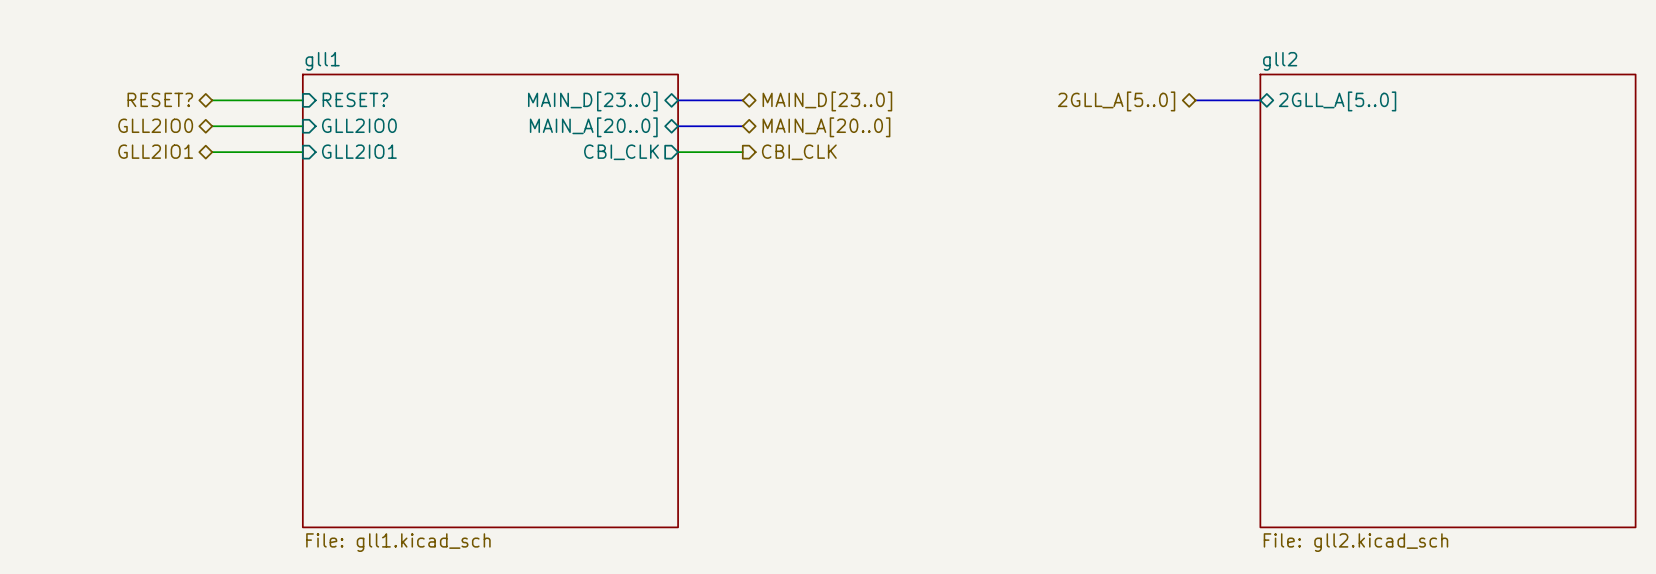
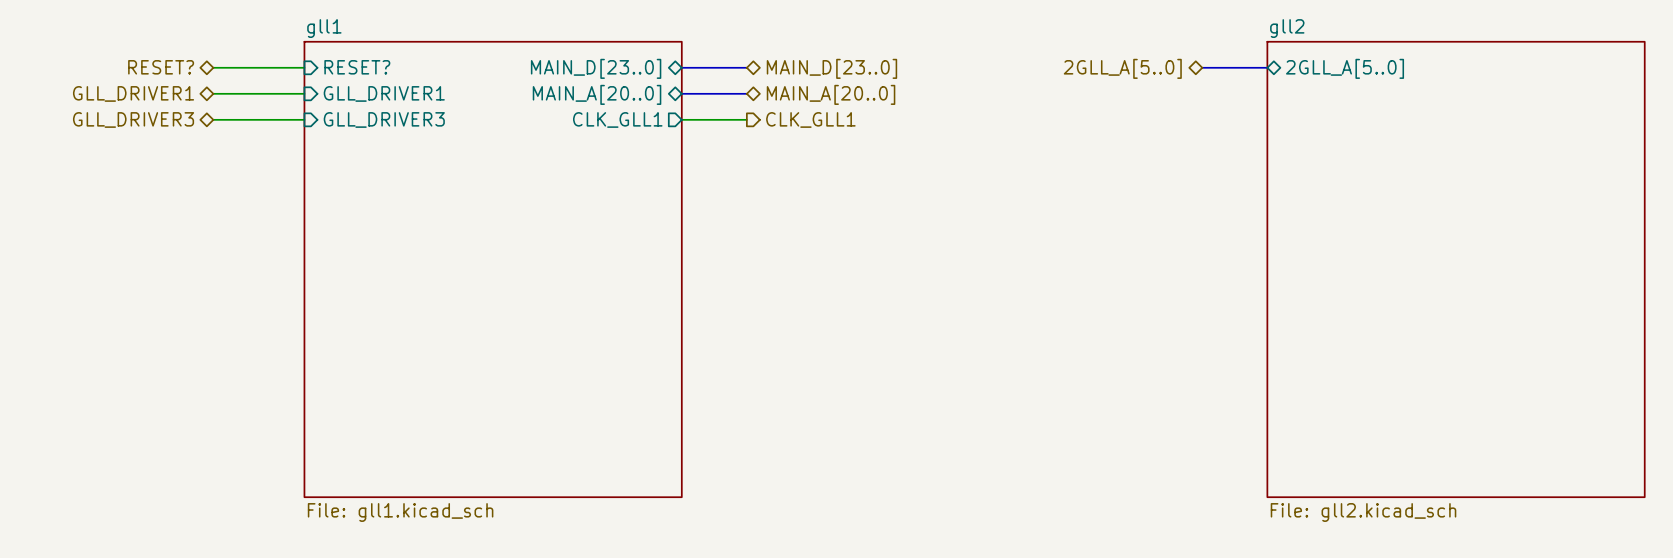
hierarchical label: GLL2IO0 (155, 125) -> GLL_DRIVER1 (133, 93)
sheet pin: GLL2IO0 (359, 125) -> GLL_DRIVER1 (384, 93)
hierarchical label: GLL2IO1 (155, 151) -> GLL_DRIVER3 (133, 119)
sheet pin: GLL2IO1 (359, 151) -> GLL_DRIVER3 (384, 119)
sheet pin: CBI_CLK (621, 152) -> CLK_GLL1 (617, 119)
hierarchical label: CBI_CLK (799, 152) -> CLK_GLL1 (810, 119)

